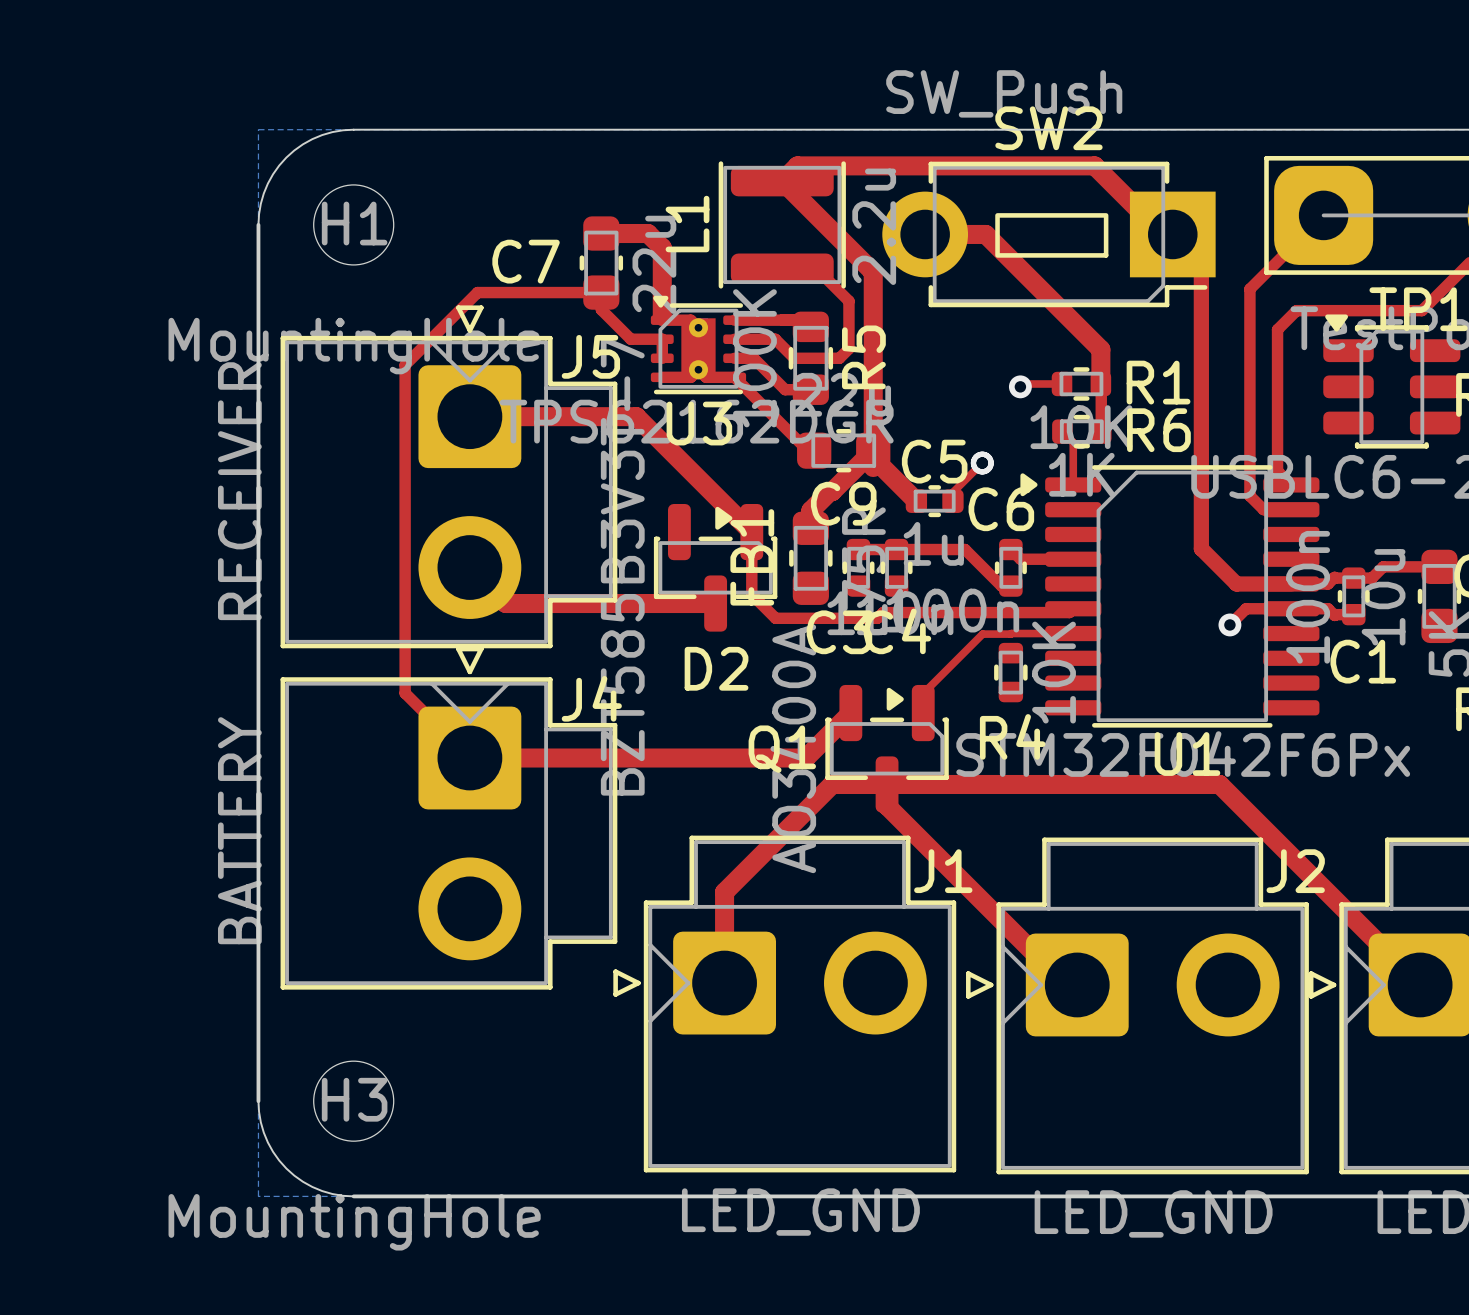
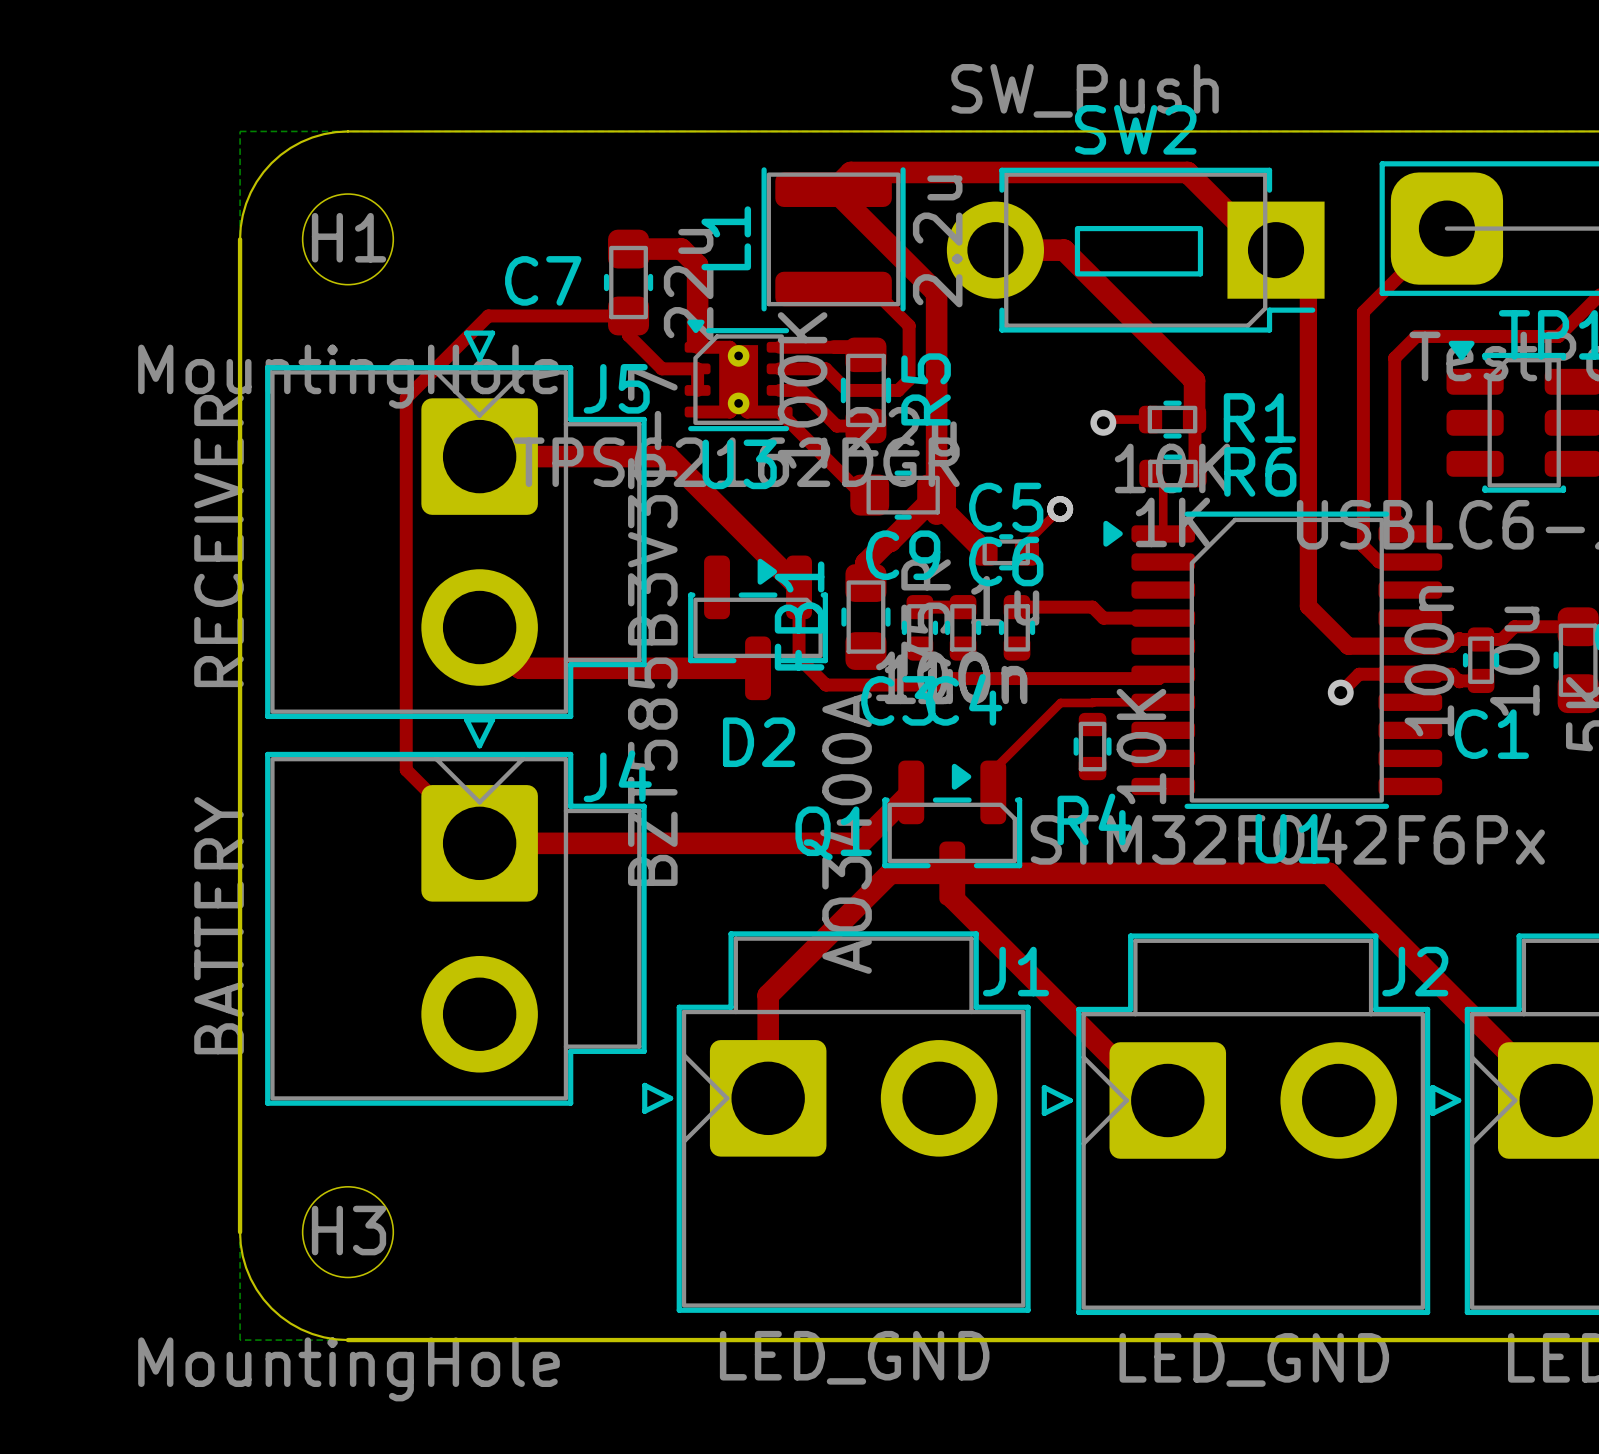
top track: (896, 549) (944, 549) -> none
top track: (965, 549) (1001, 586) (1010, 586) -> (1040, 607) (1092, 607)
C6 position: (1010, 567) -> (1017, 627)

